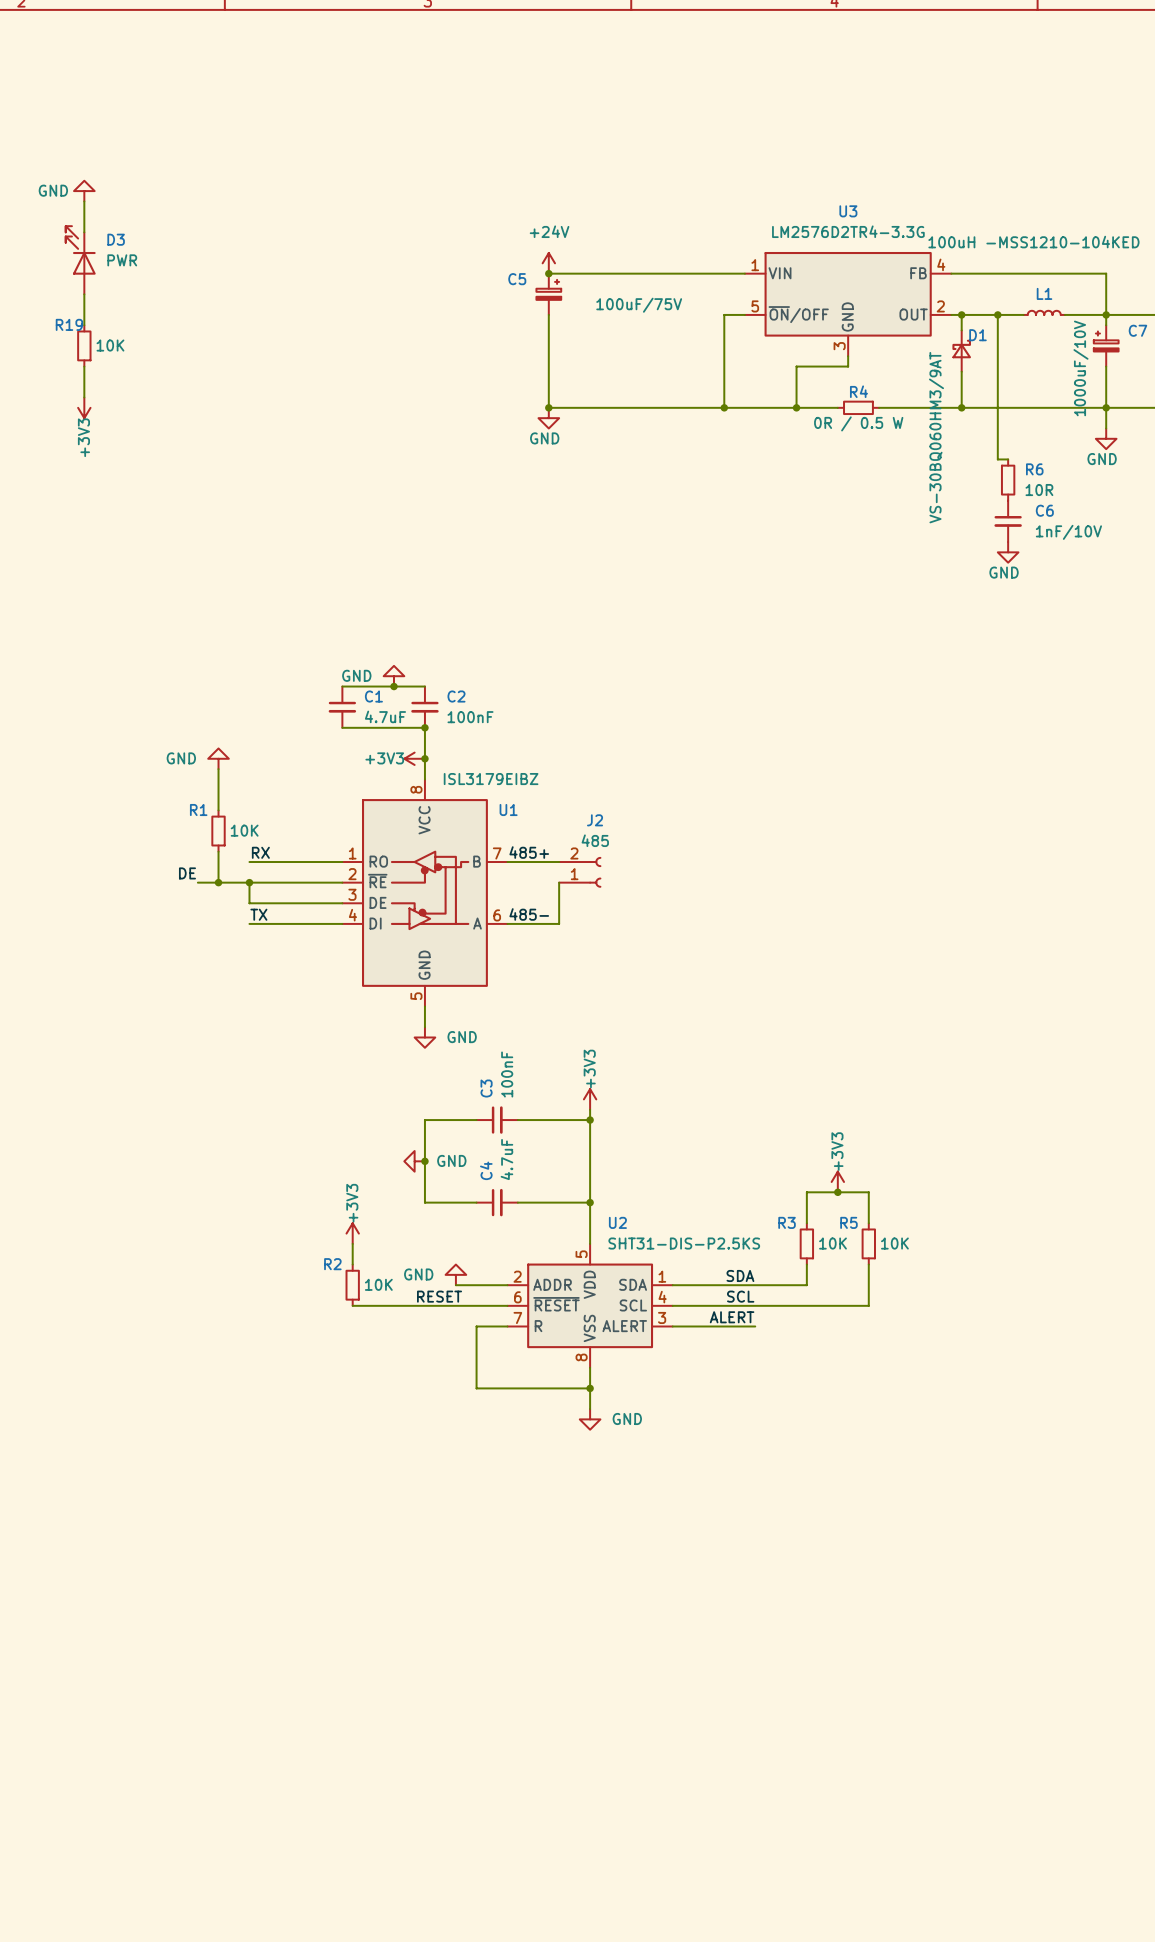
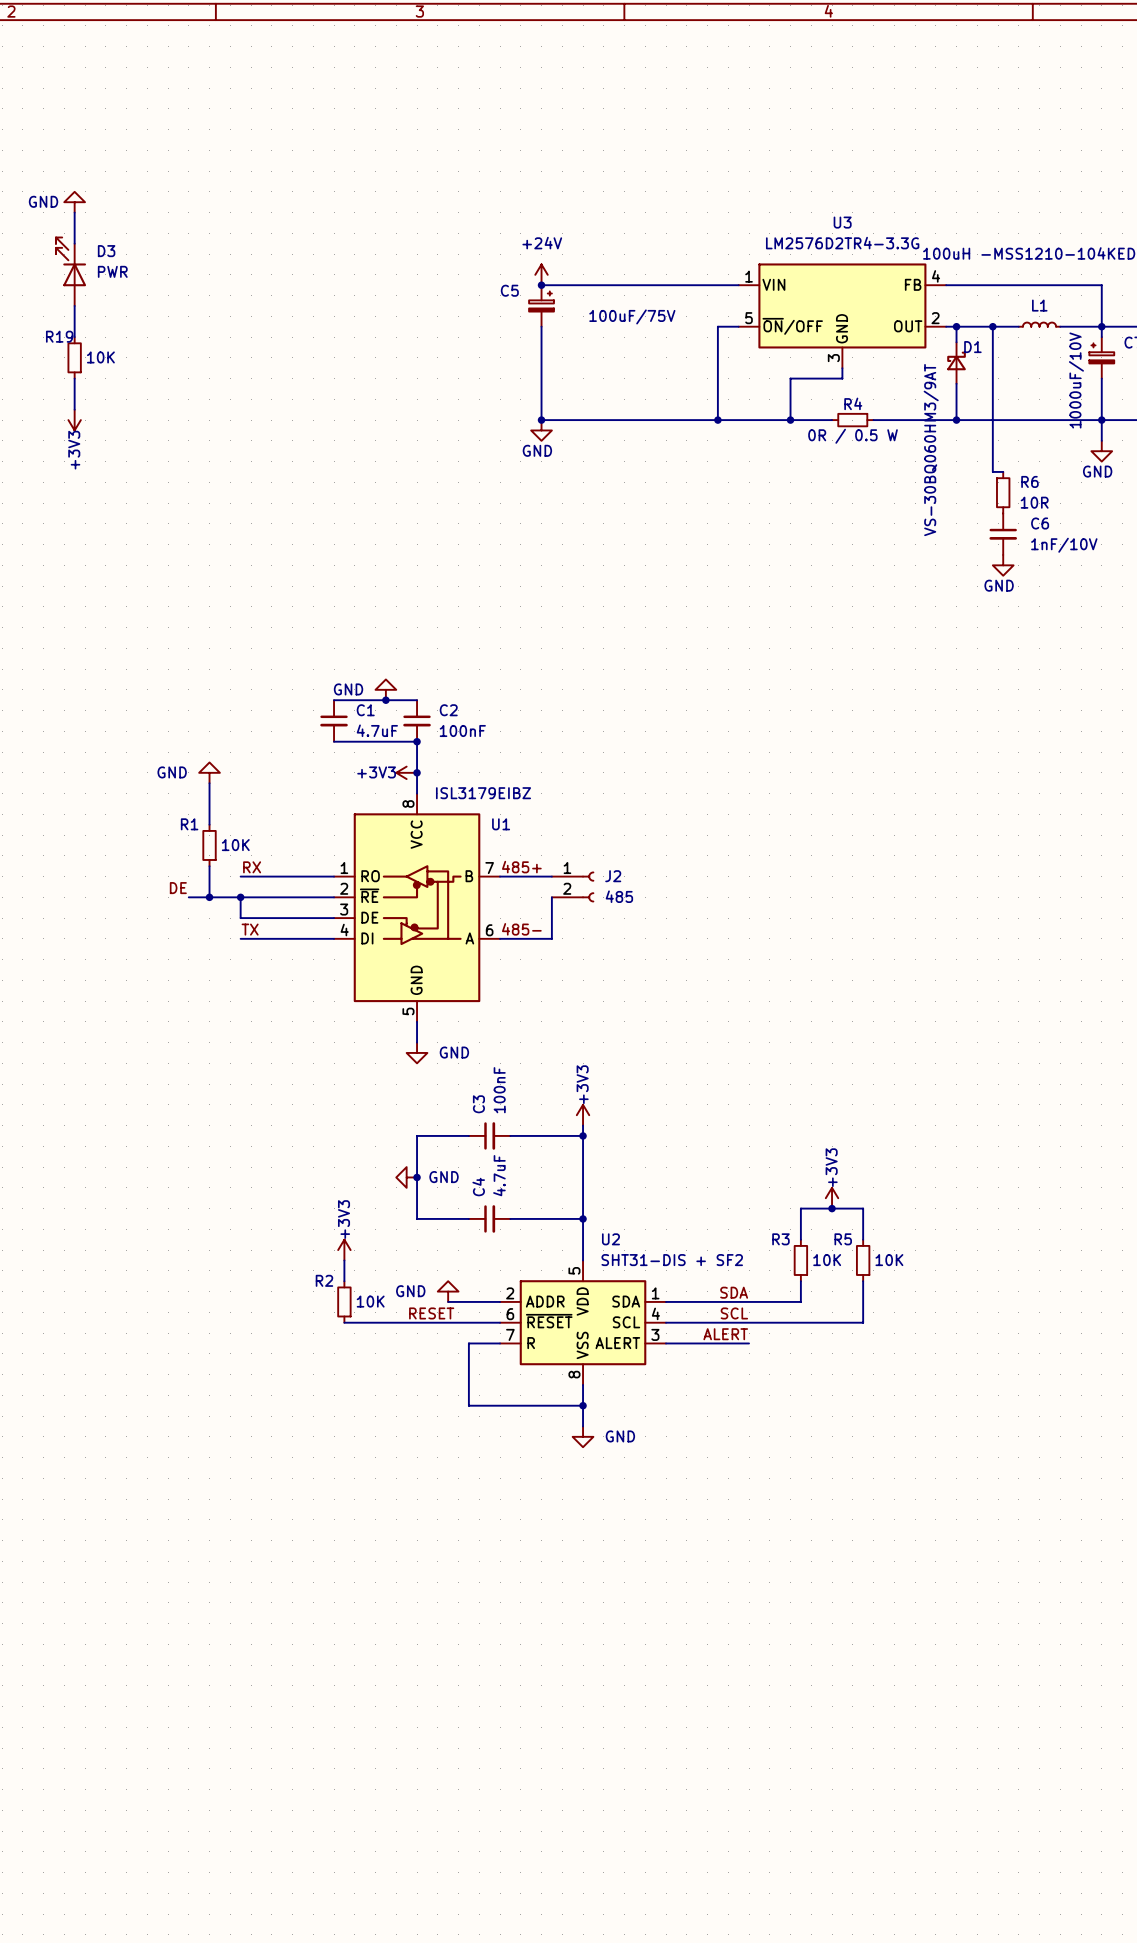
J2 name position: J2 (595, 820) -> J2 (613, 876)
J2 value position: 485 (595, 840) -> 485 (619, 896)
J2 flip: as is (595, 872) -> up-down (588, 886)
U2 value: SHT31-DIS-P2.5KS (684, 1243) -> SHT31-DIS + SF2 (672, 1260)

